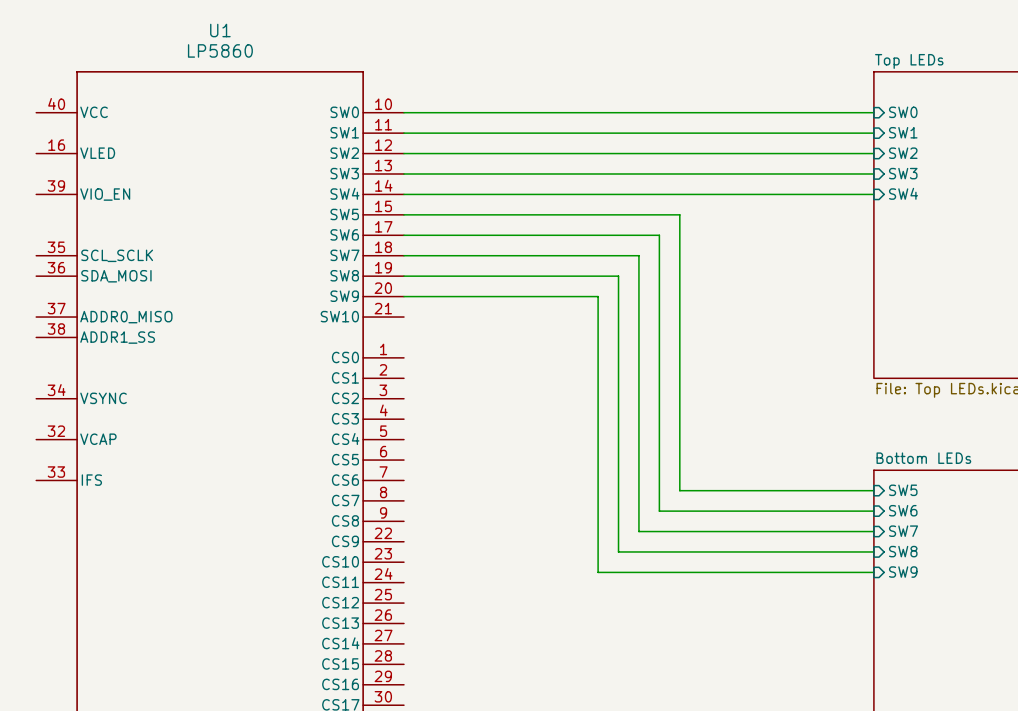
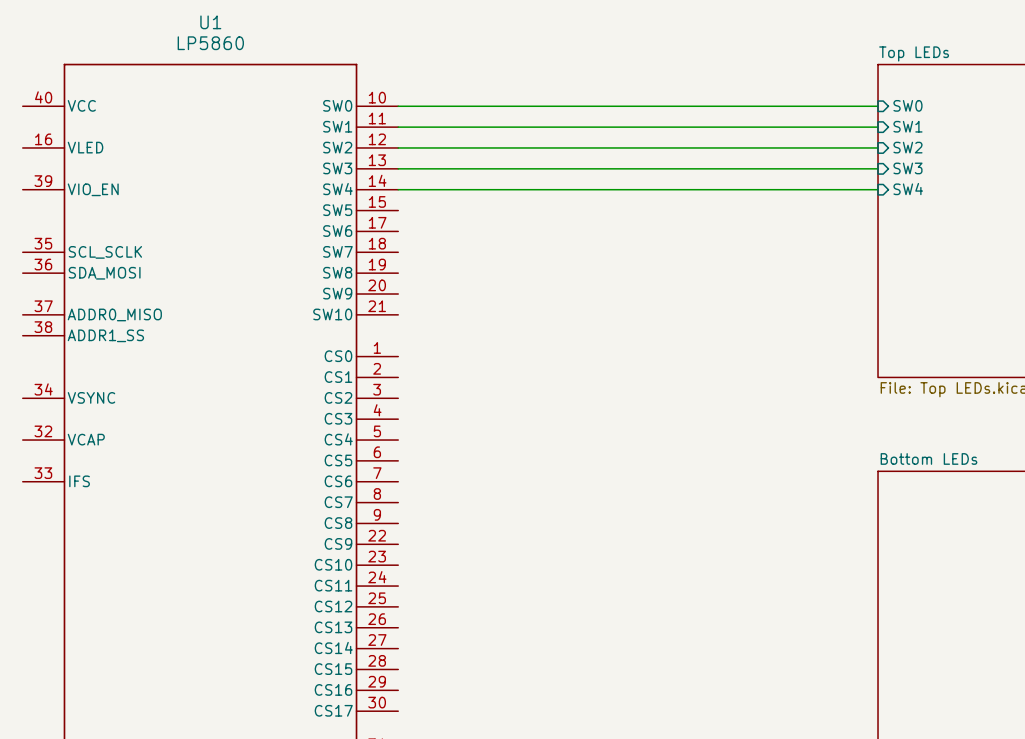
wire: (403, 214) (679, 214) (679, 490) (873, 490) -> none
wire: (403, 235) (659, 235) (659, 511) (873, 511) -> none
wire: (403, 255) (638, 255) (638, 531) (873, 531) -> none
wire: (403, 276) (618, 276) (618, 551) (873, 551) -> none
wire: (403, 296) (598, 296) (598, 572) (873, 572) -> none
sheet pin: SW5 (903, 490) -> none
sheet pin: SW6 (903, 510) -> none
sheet pin: SW7 (903, 531) -> none
sheet pin: SW8 (903, 551) -> none
sheet pin: SW9 (903, 572) -> none

